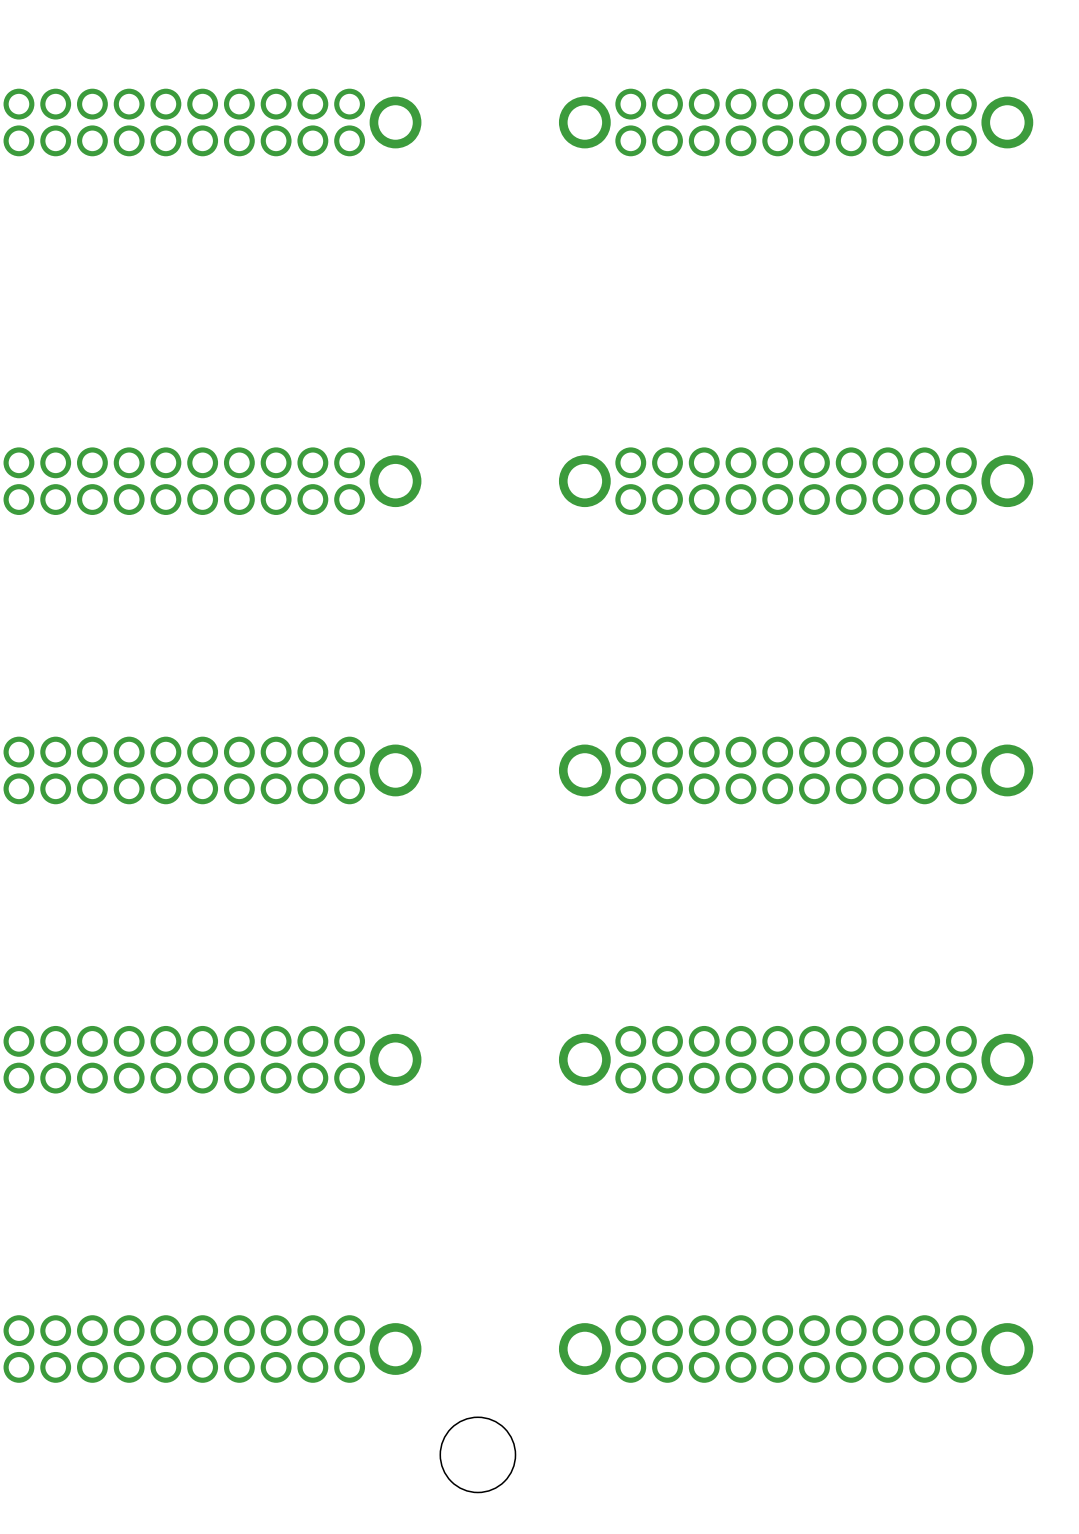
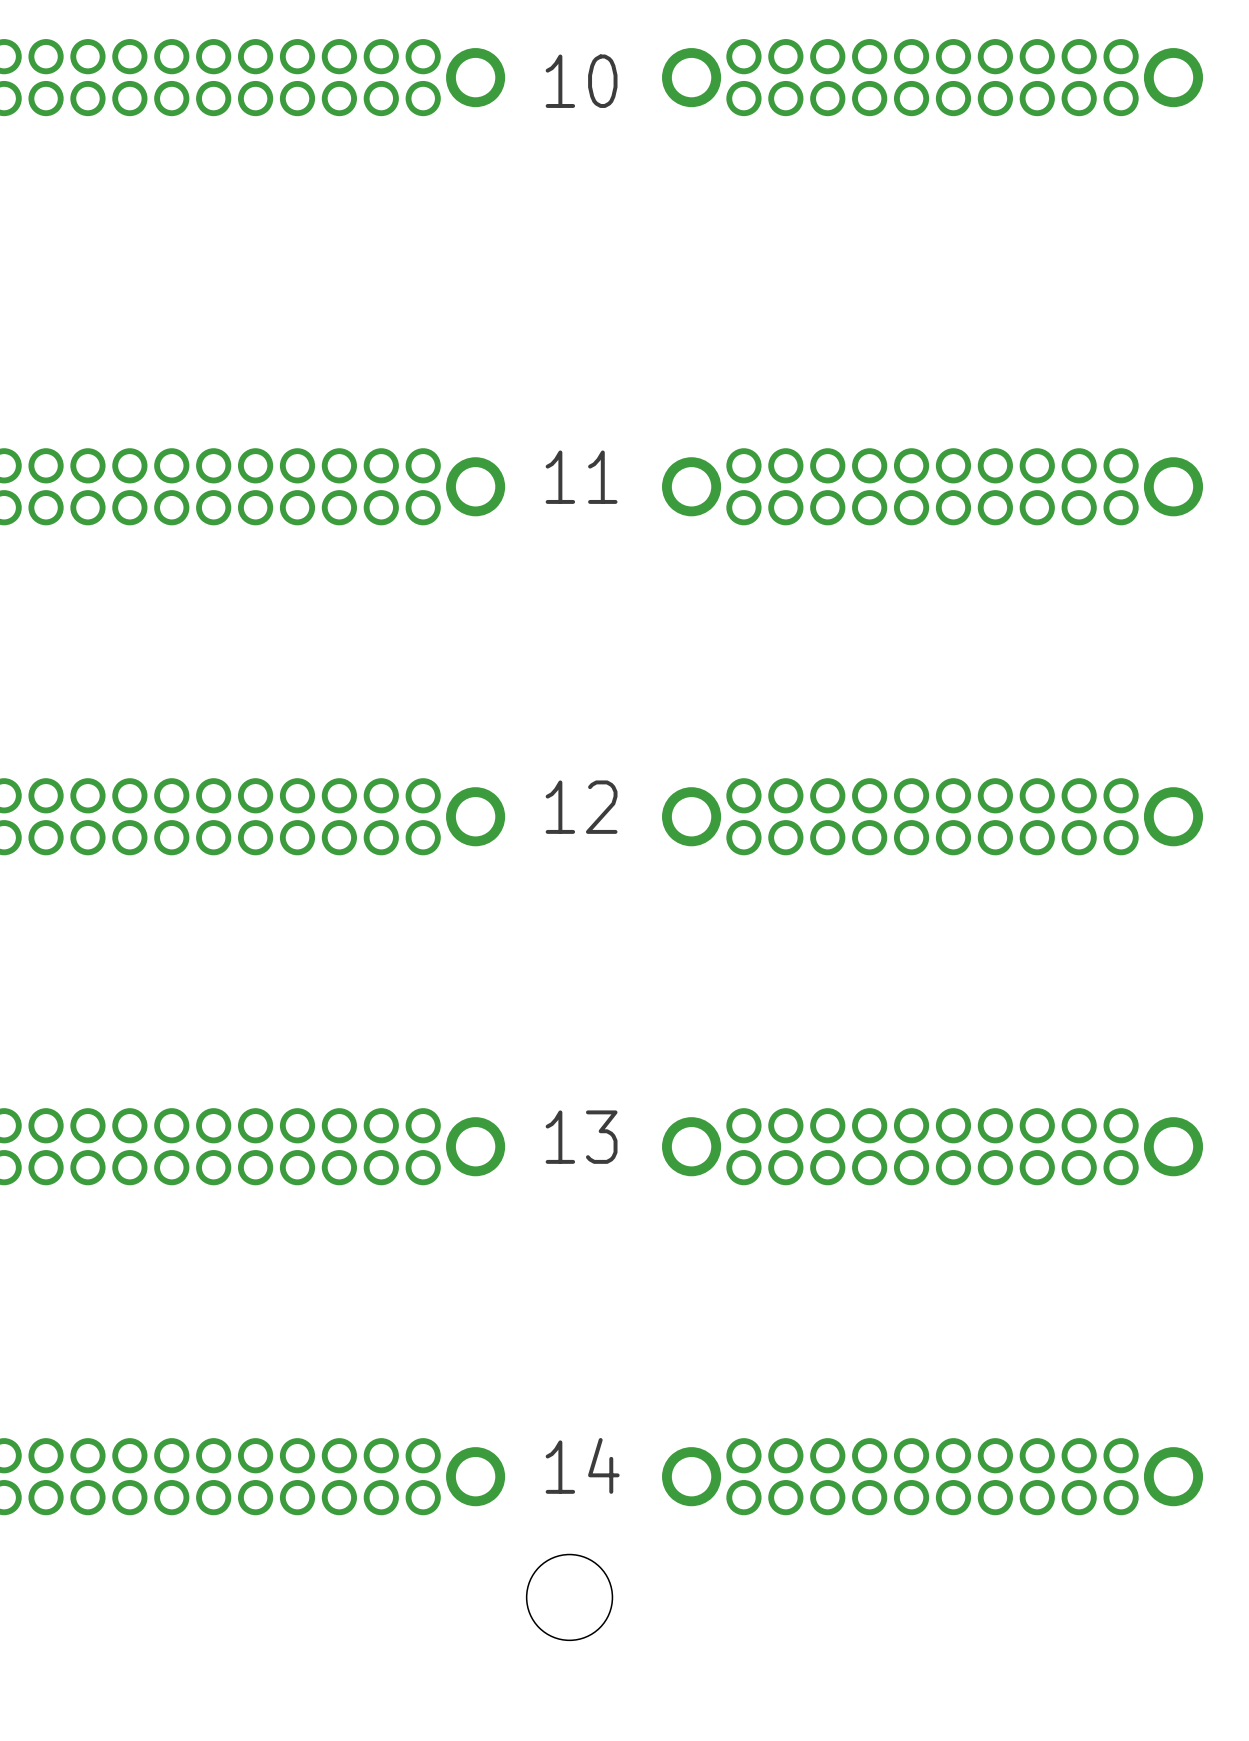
text: none -> 10 (581, 81)
text: none -> 11 (581, 477)
text: none -> 12 (581, 807)
text: none -> 13 (581, 1137)
text: none -> 14 (582, 1465)

